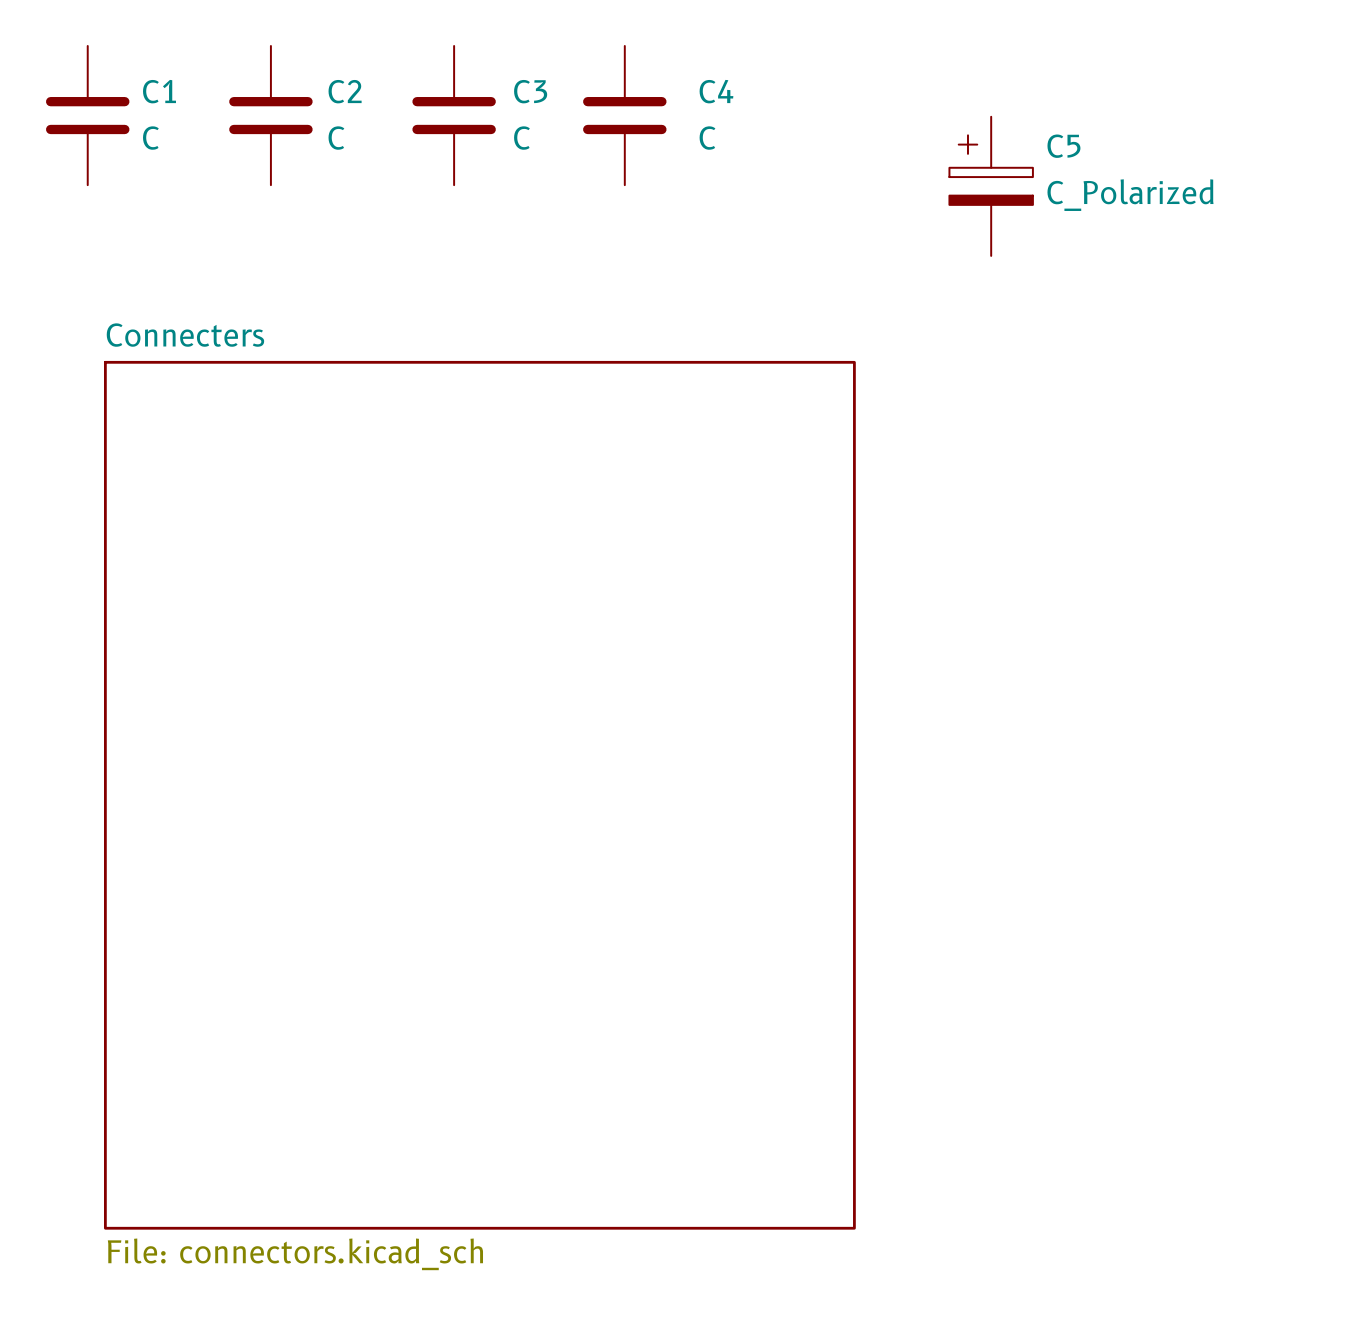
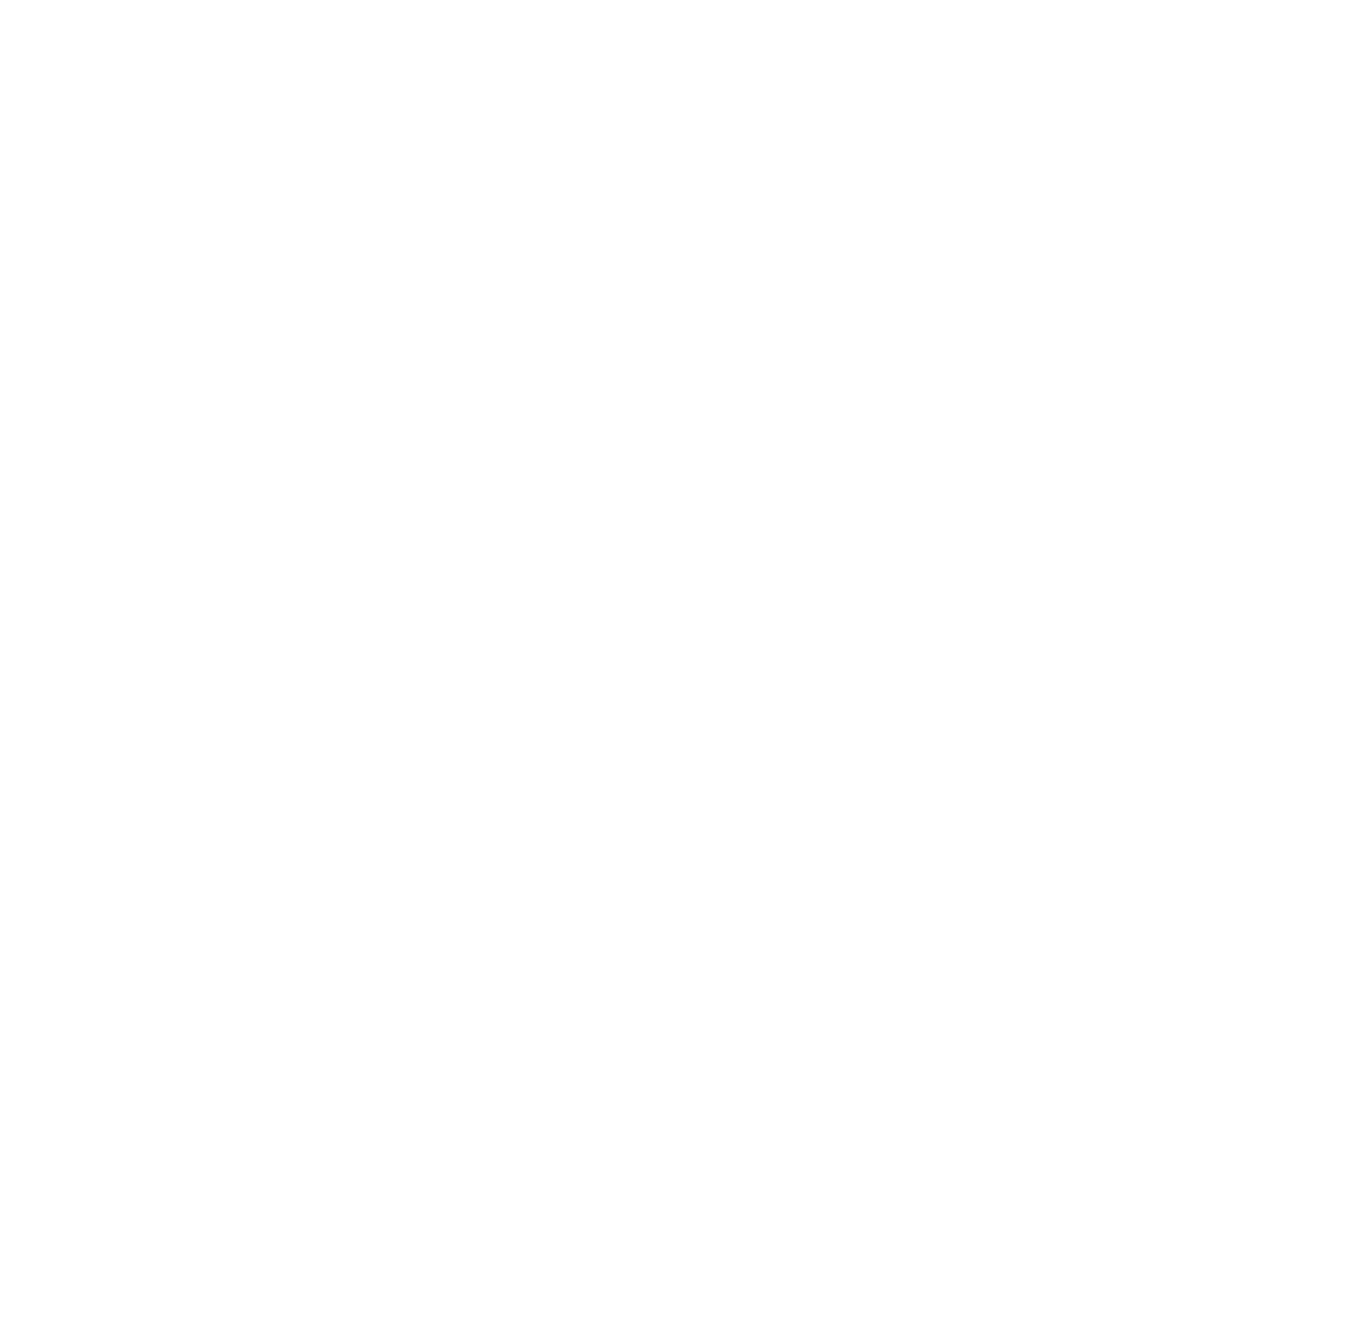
C1: C (87, 115) -> none
C2: C (270, 115) -> none
C3: C (454, 115) -> none
C4: C (624, 115) -> none
C5: C_Polarized (991, 186) -> none
sheet Connecters: File: connectors.kicad_sch (479, 795) -> none

